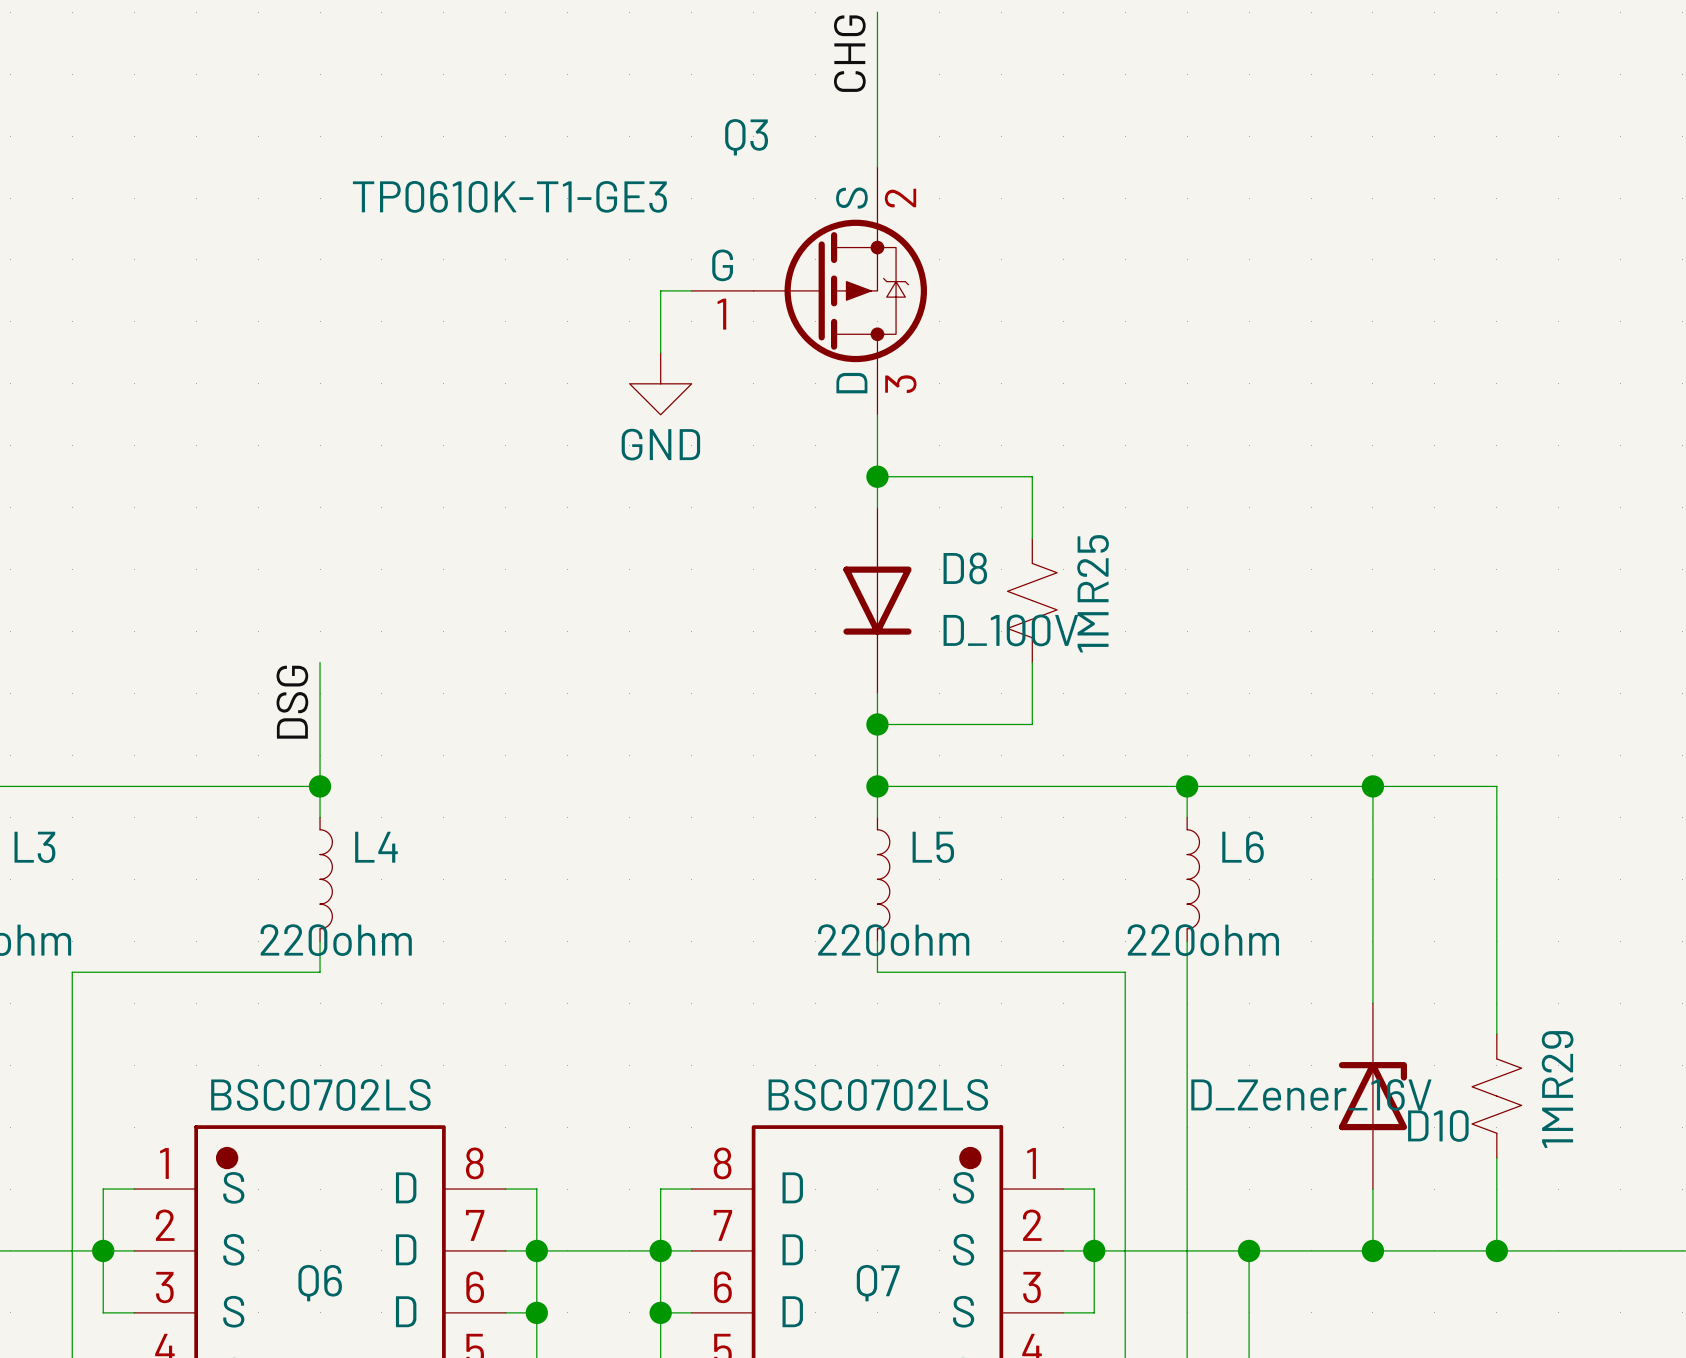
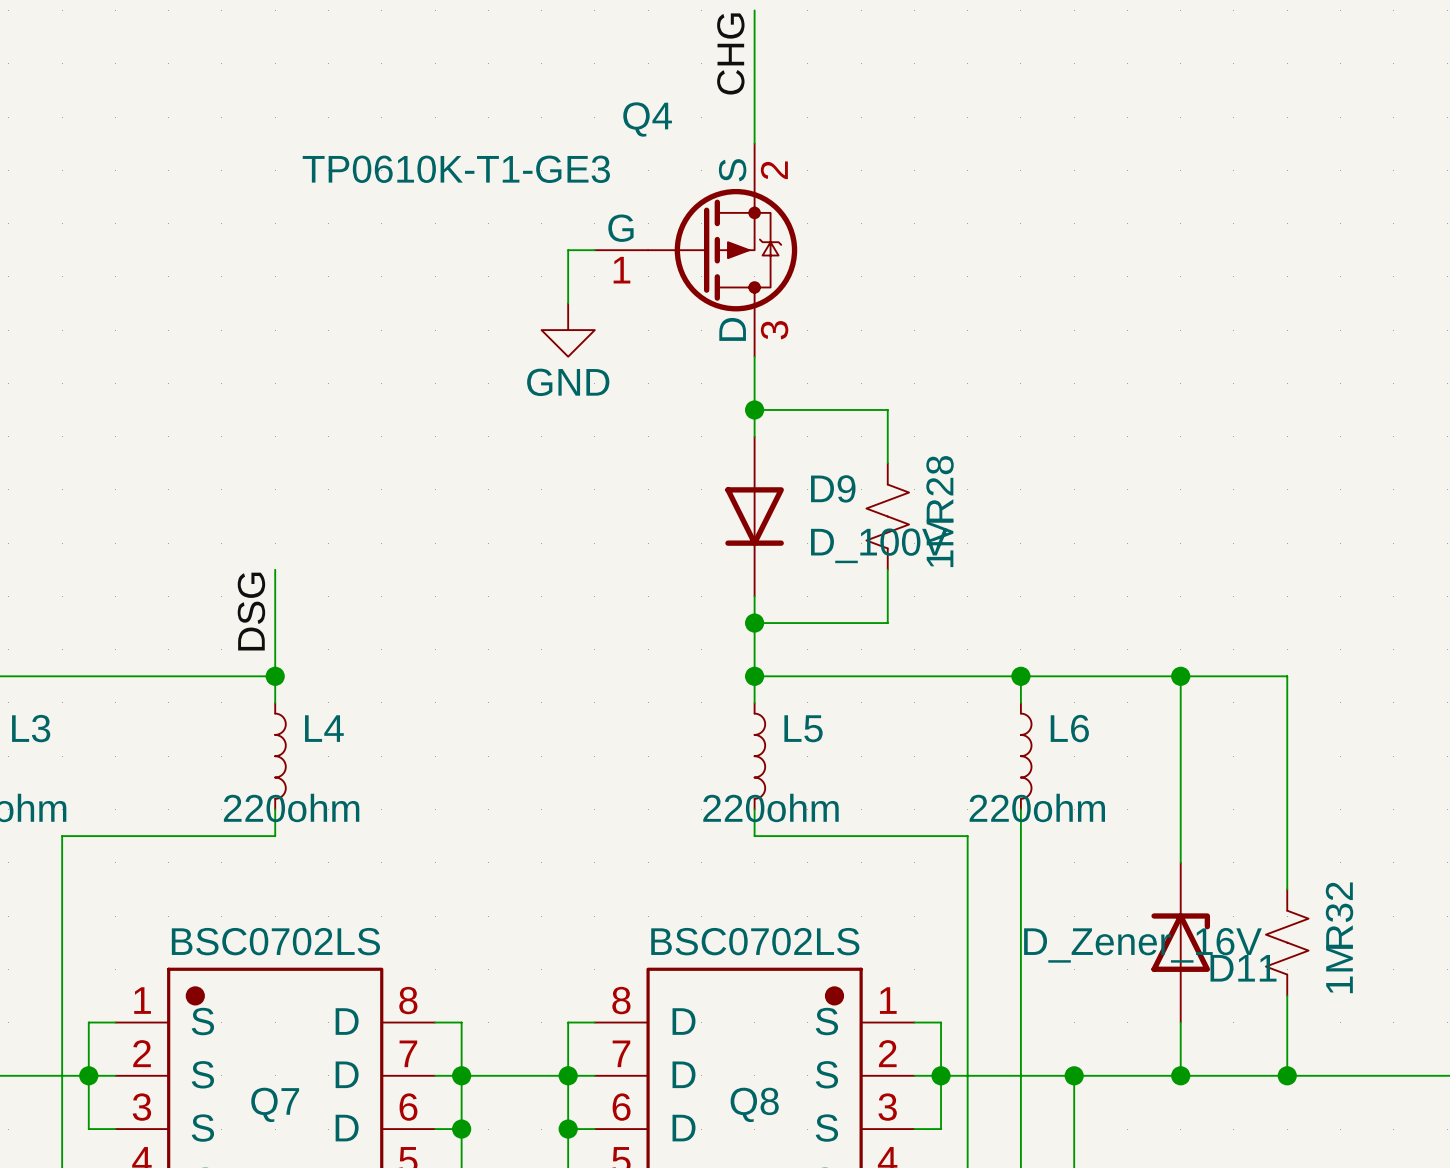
Q3 name: Q3 (746, 137) -> Q4 (647, 119)
D8 name: D8 (965, 568) -> D9 (833, 488)
R25 name: R25 (1093, 568) -> R28 (940, 489)
R29 name: R29 (1557, 1064) -> R32 (1339, 915)
D10 name: D10 (1438, 1125) -> D11 (1243, 968)
Q6 name: Q6 (320, 1283) -> Q7 (275, 1104)
Q7 name: Q7 (878, 1283) -> Q8 (754, 1104)

